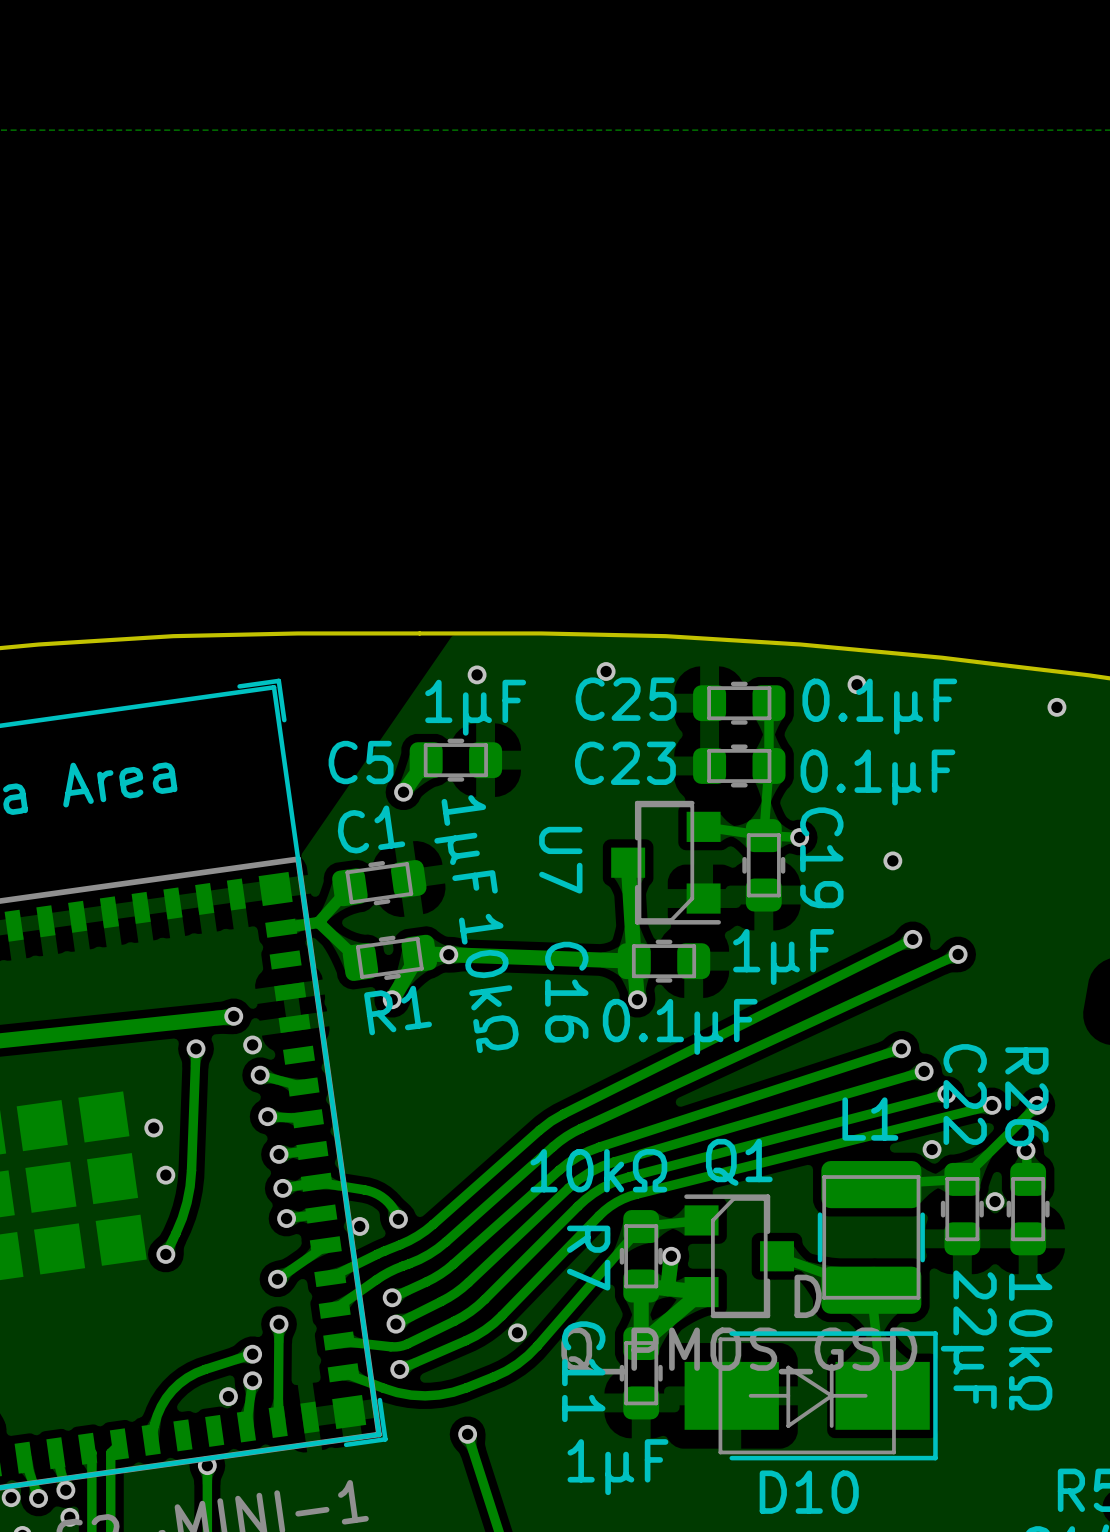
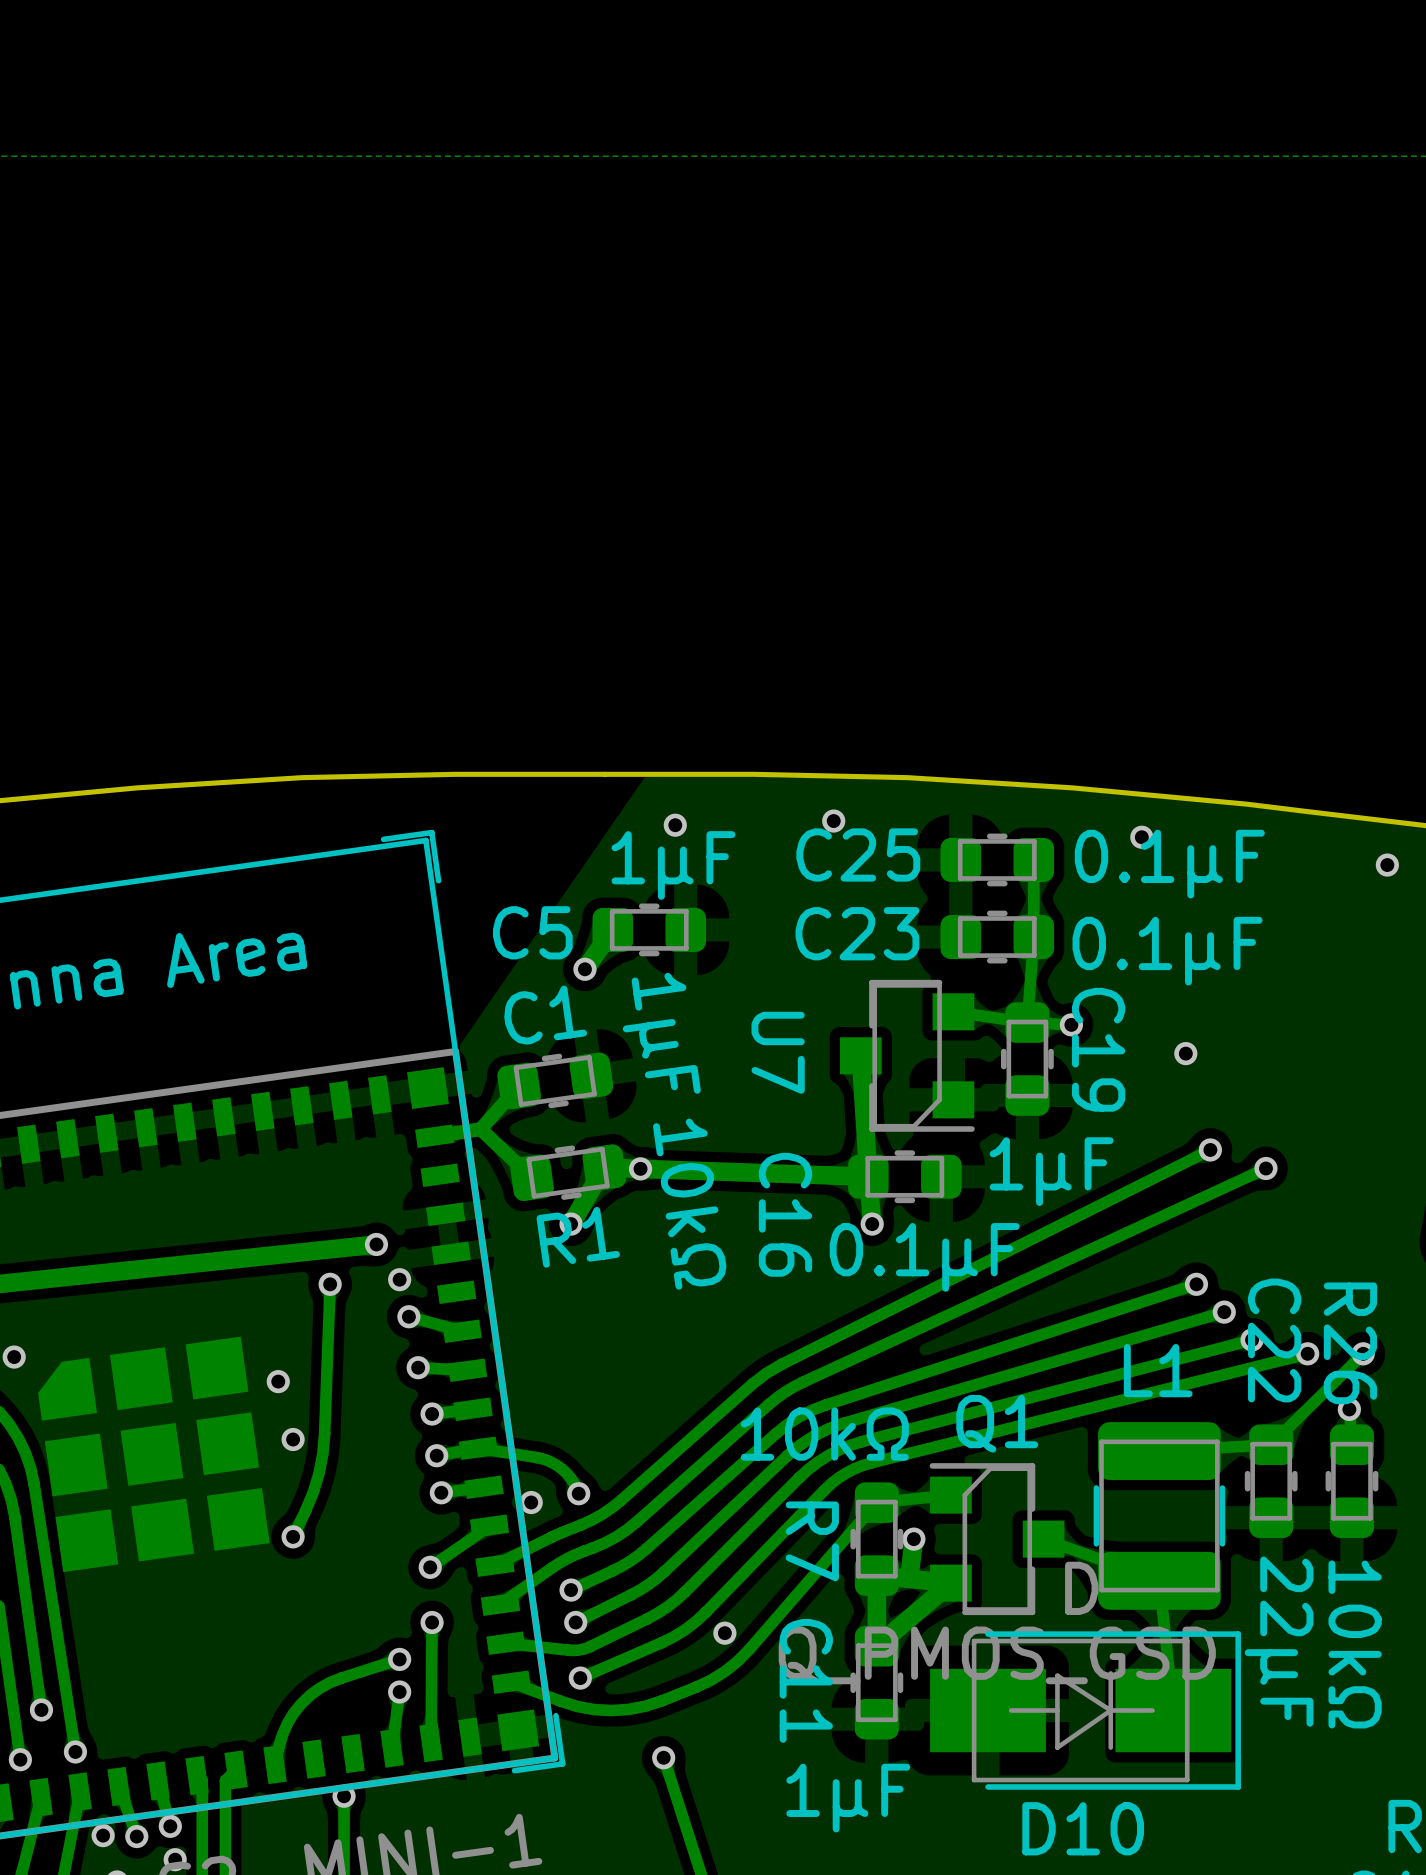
via: (932, 1149) -> none
via: (995, 1201) -> none
via: (228, 1396) -> none

